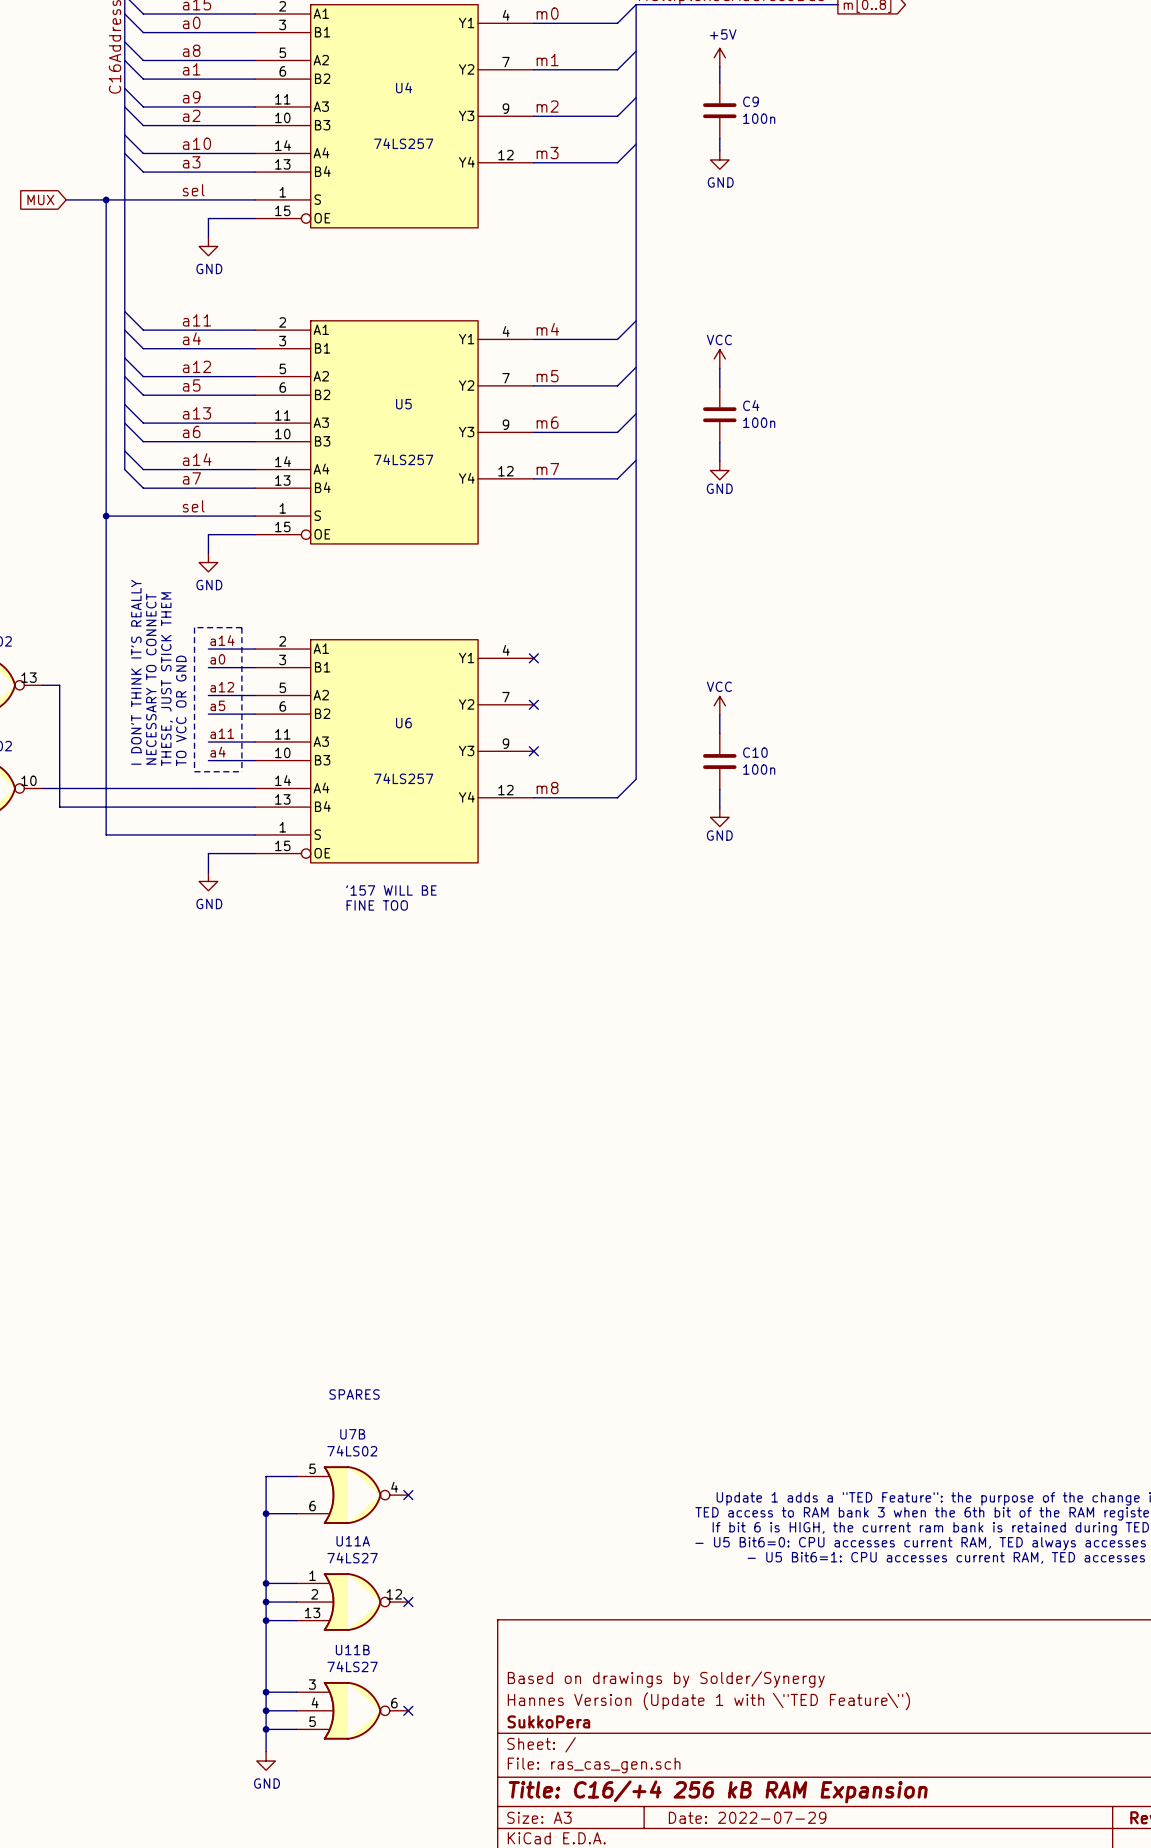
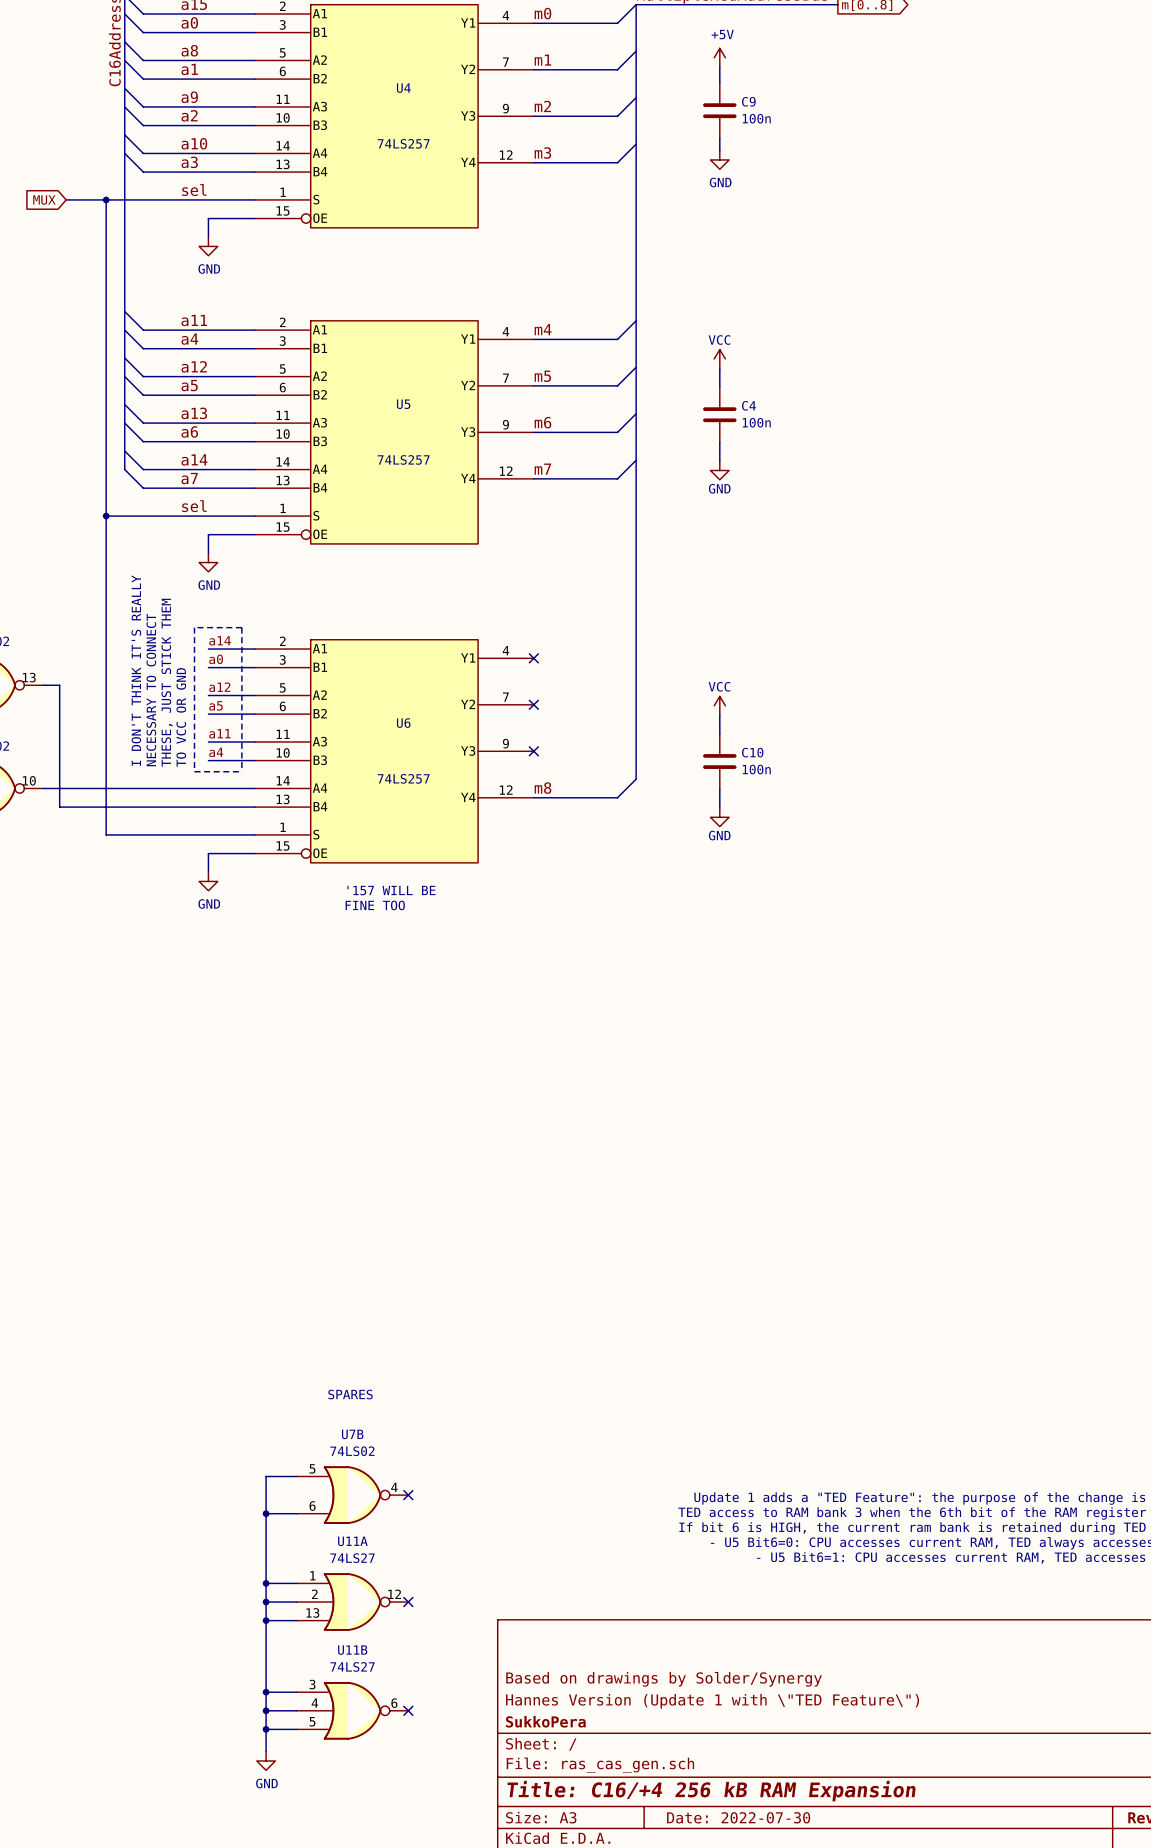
title block: Date: 2022-07-29 (747, 1817) -> Date: 2022-07-30 (738, 1817)

